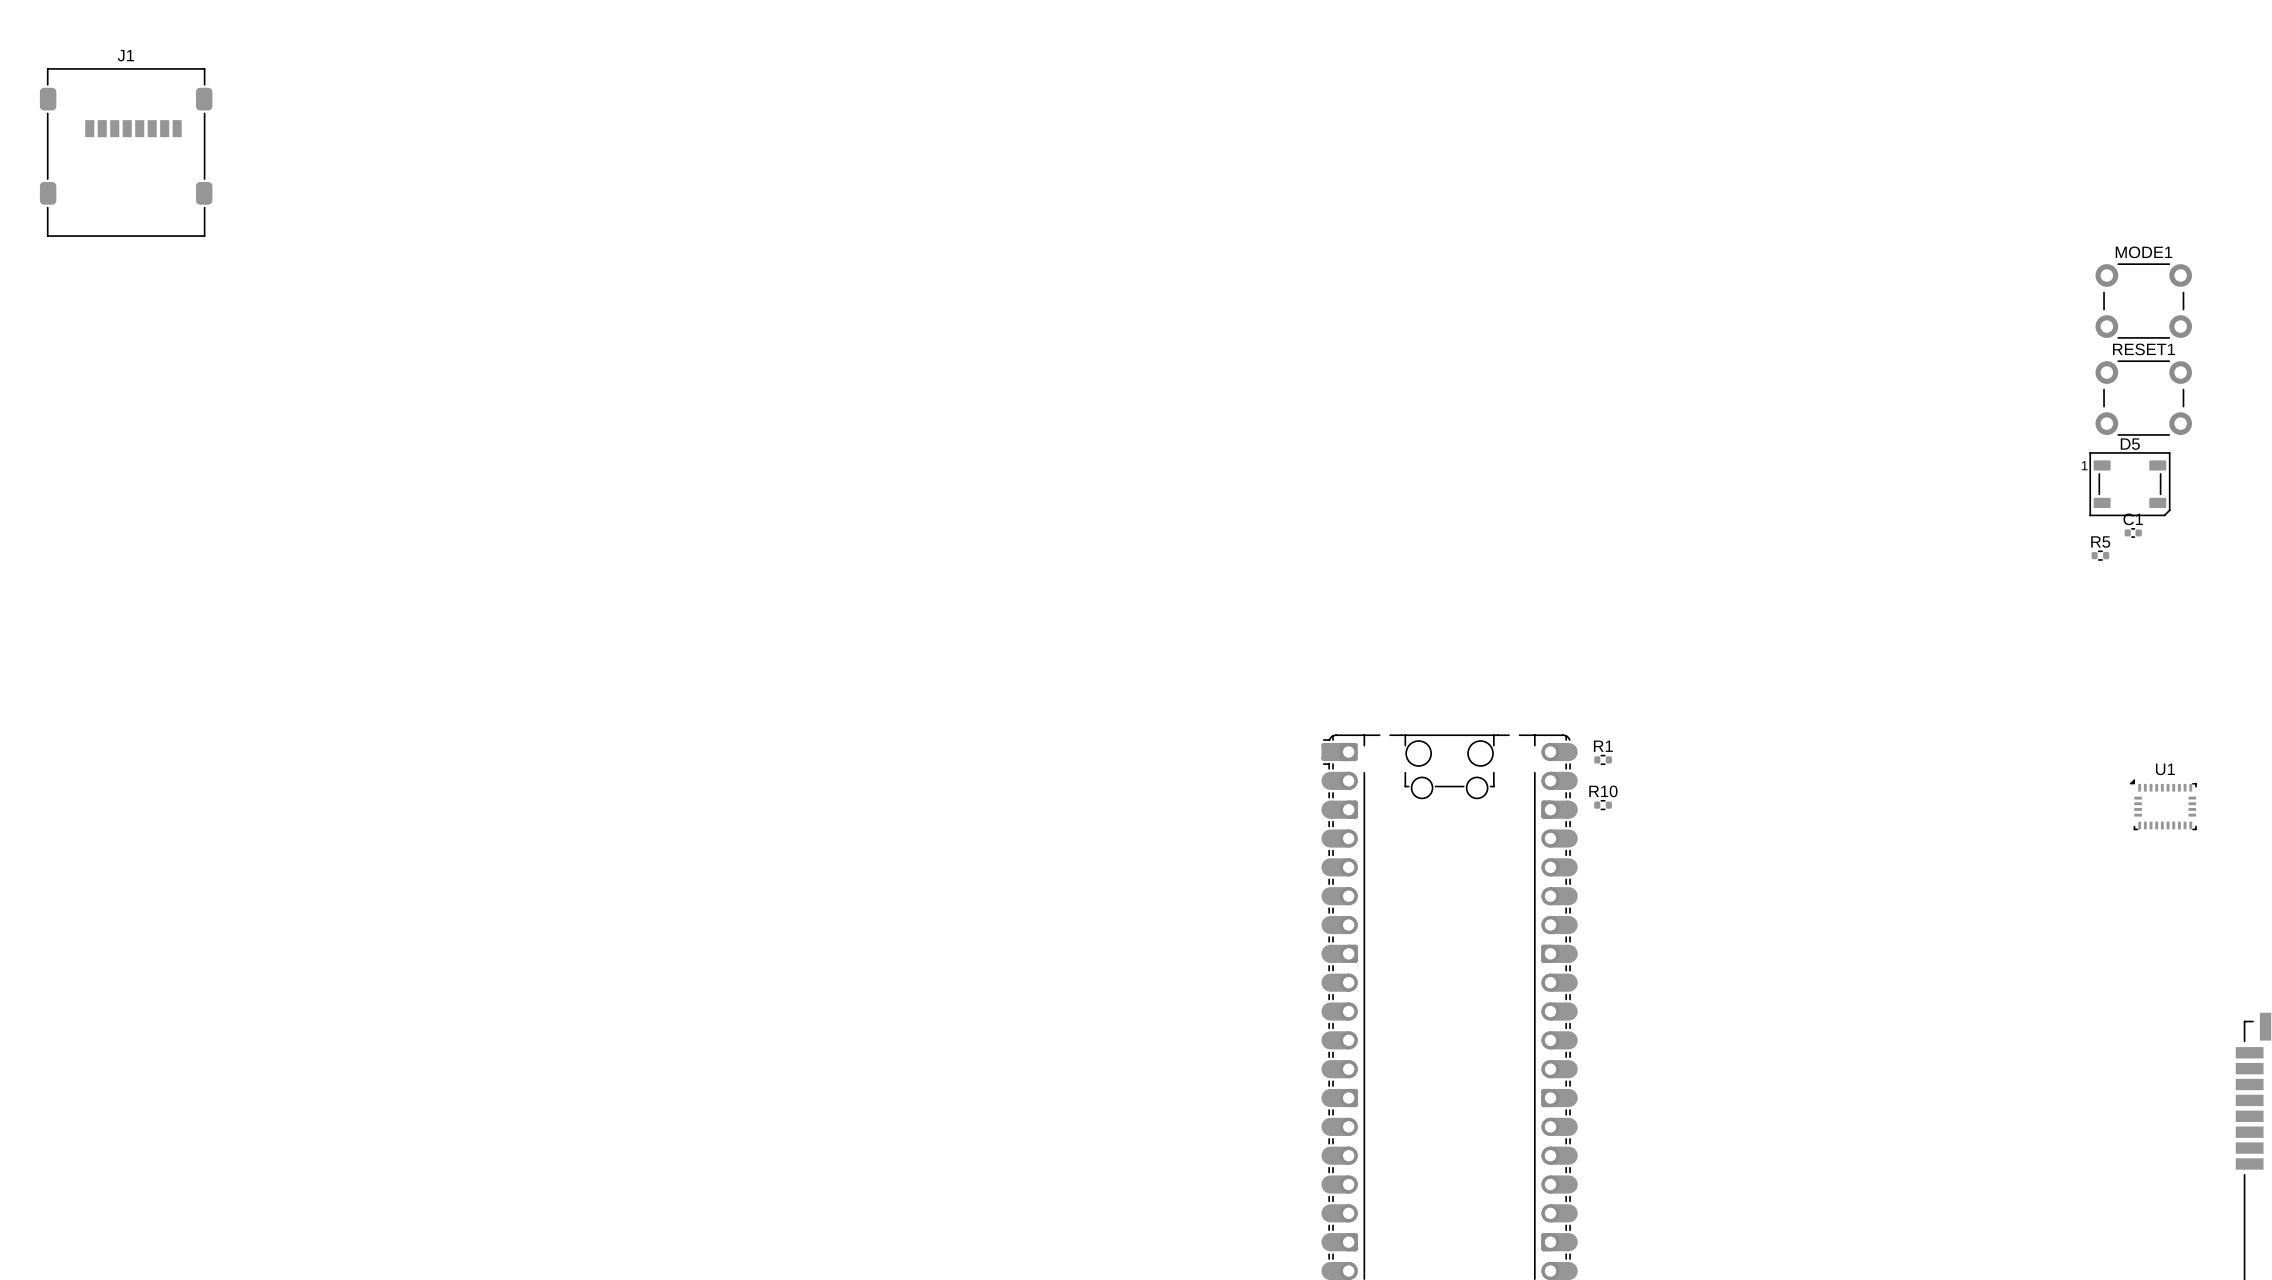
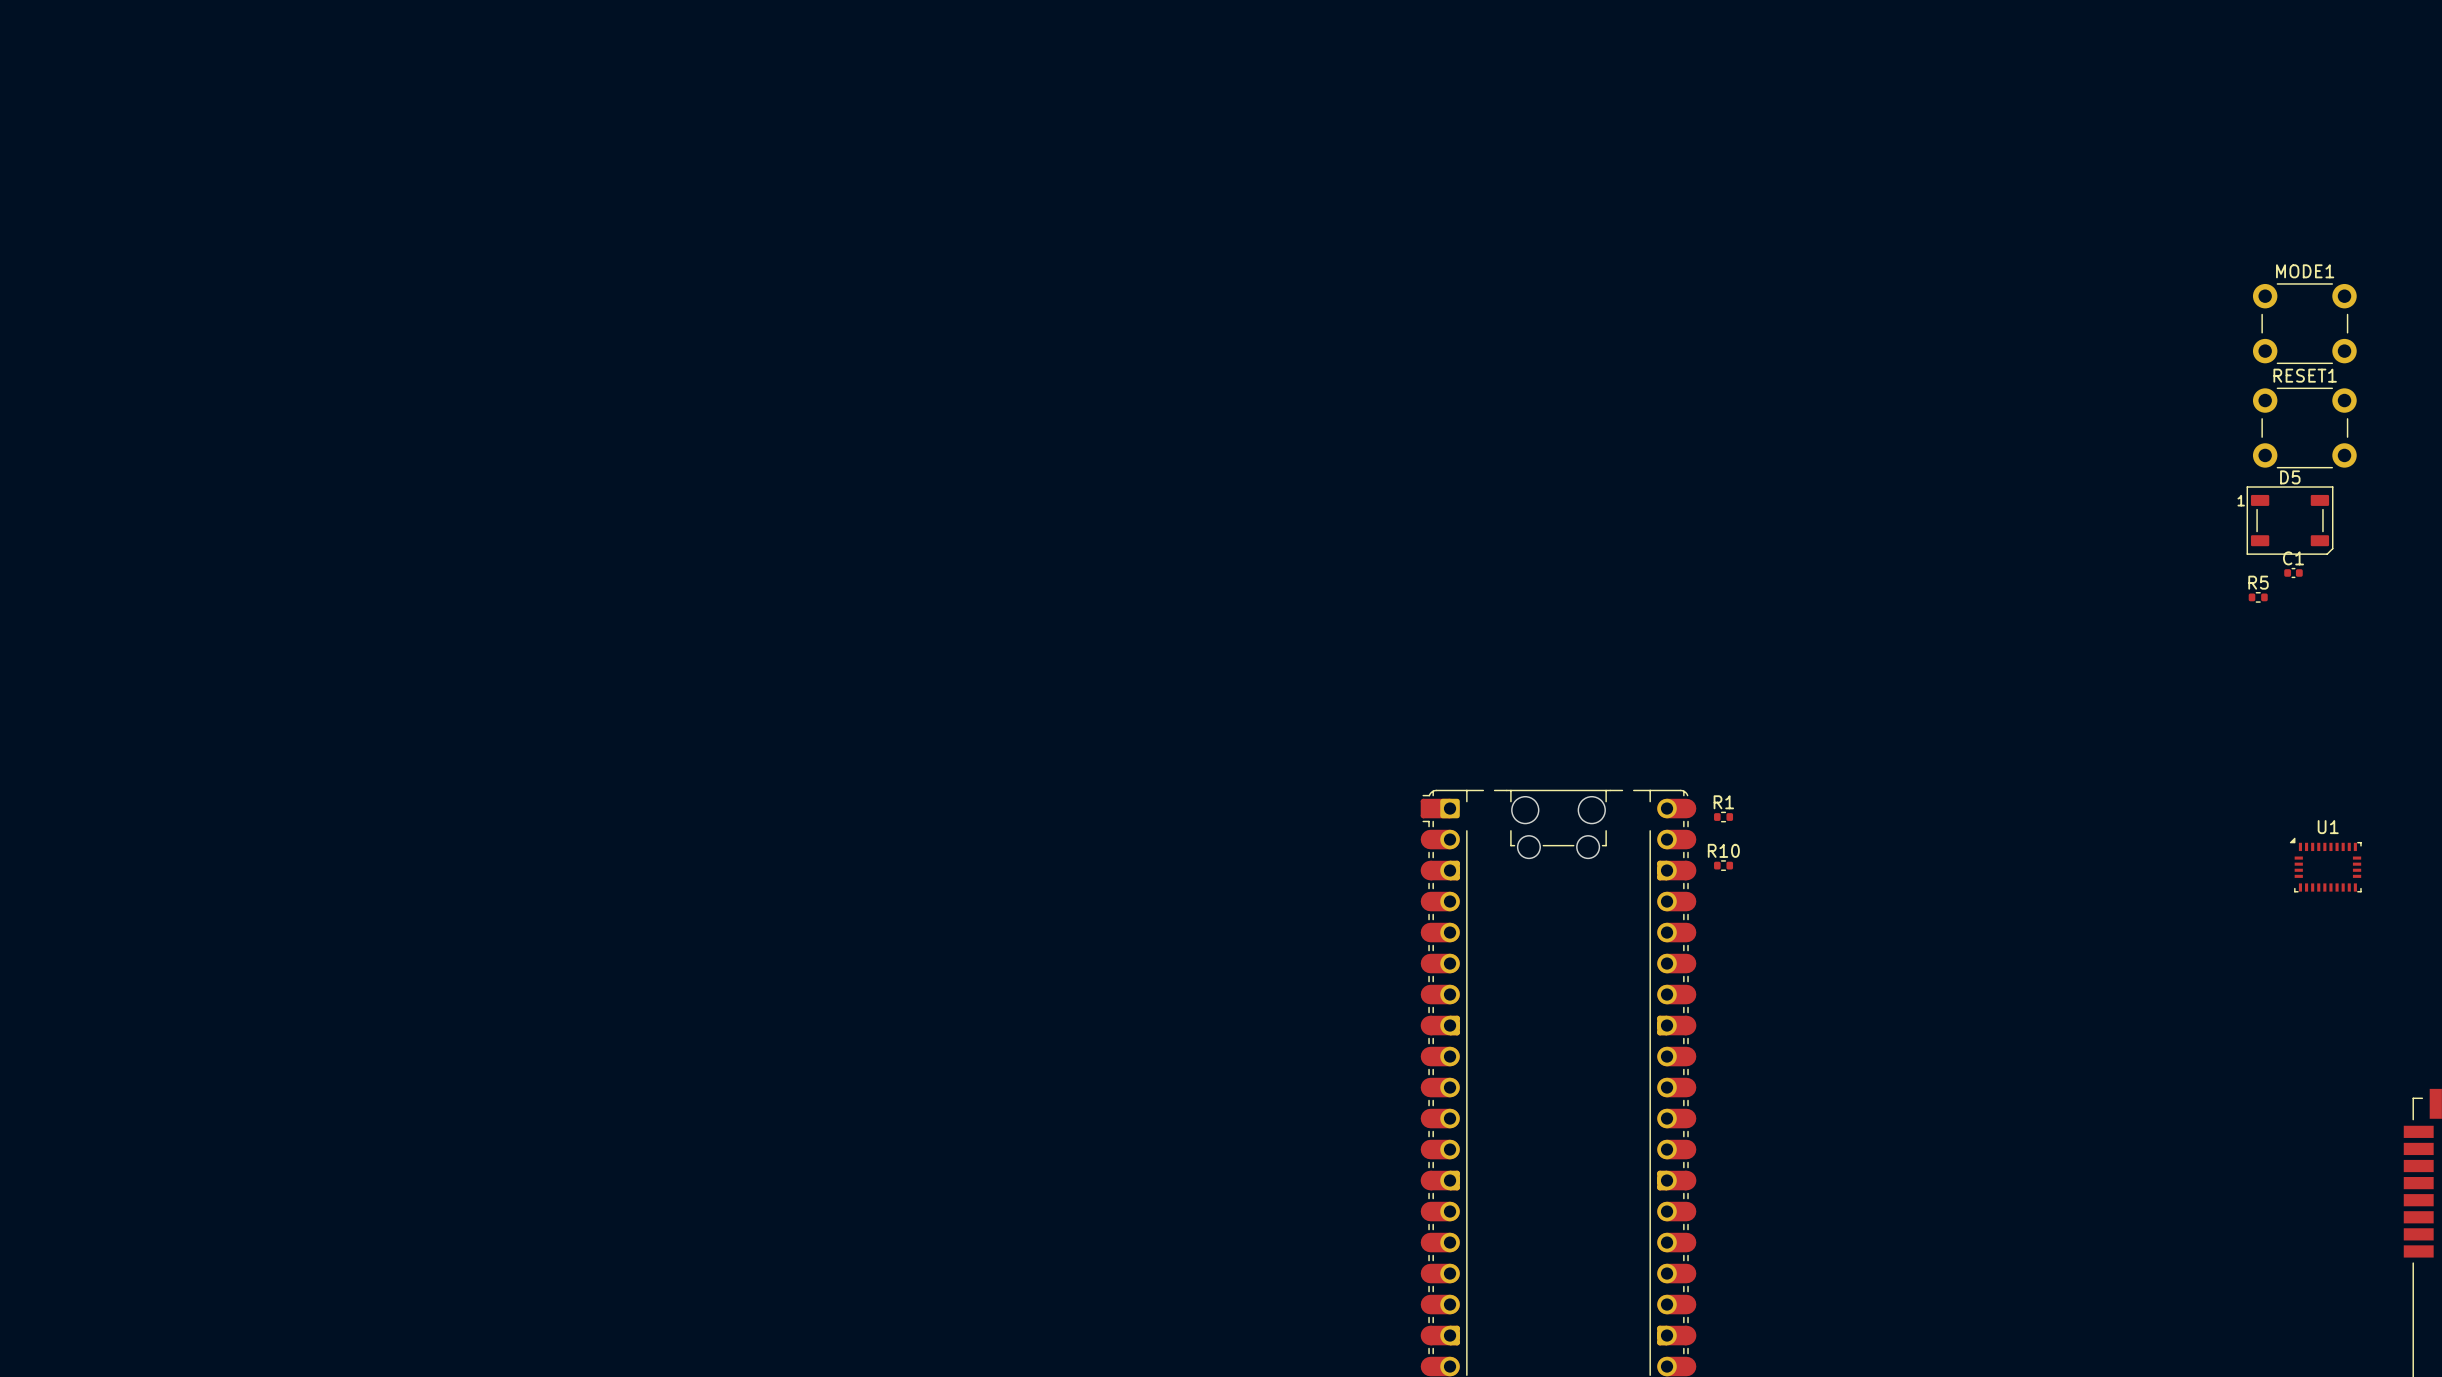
J1: (126, 152) -> none

